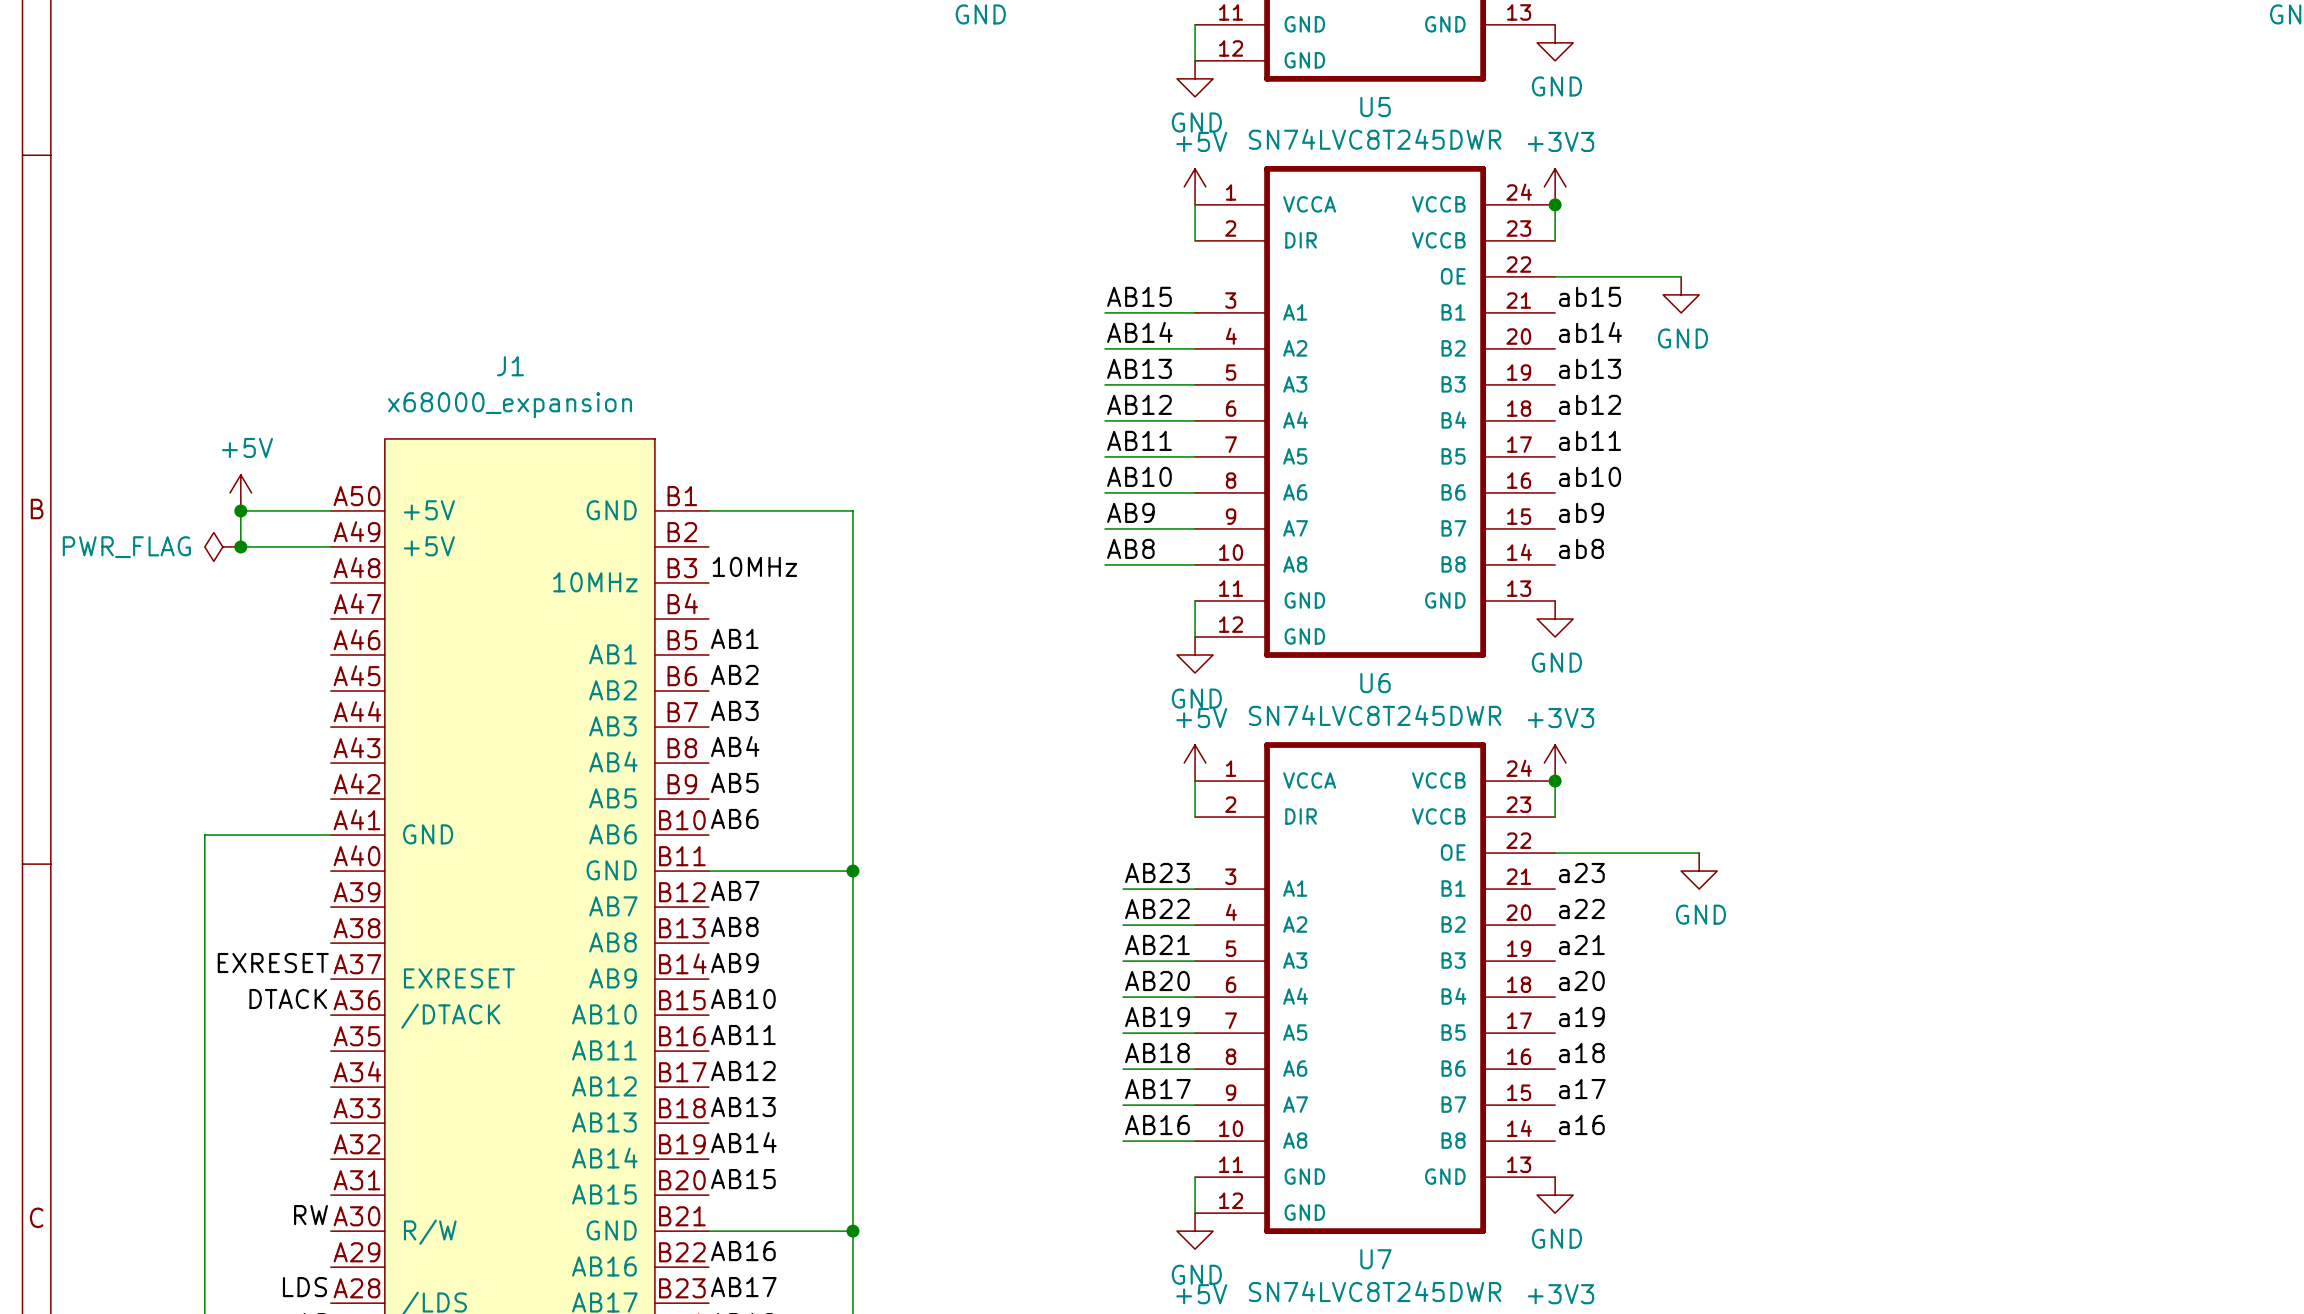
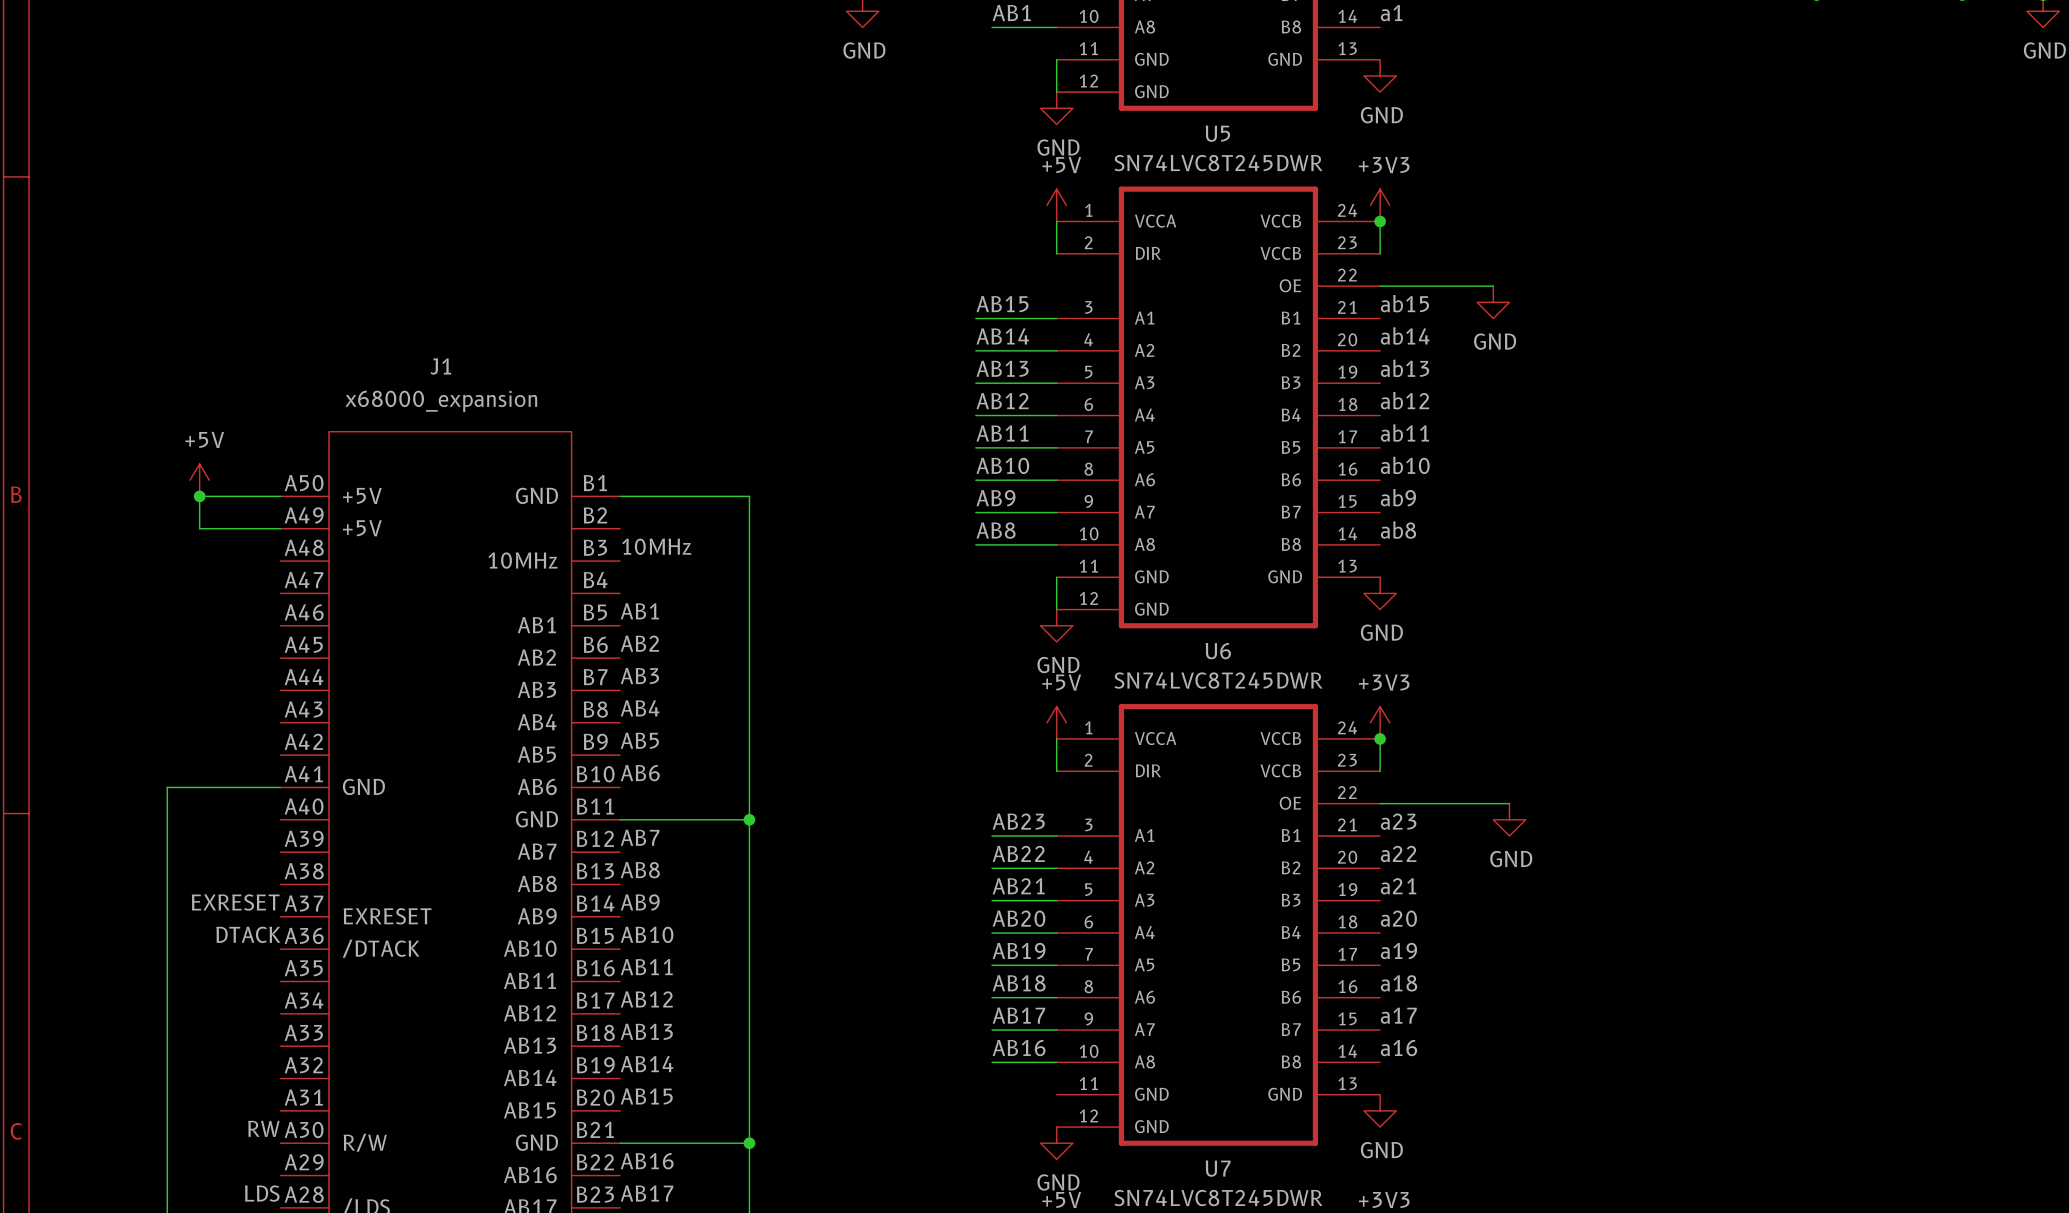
power symbol: PWR_FLAG (222, 546) -> none
junction: (240, 546) -> none
wire: (1195, 1177) (1195, 1213) -> none

